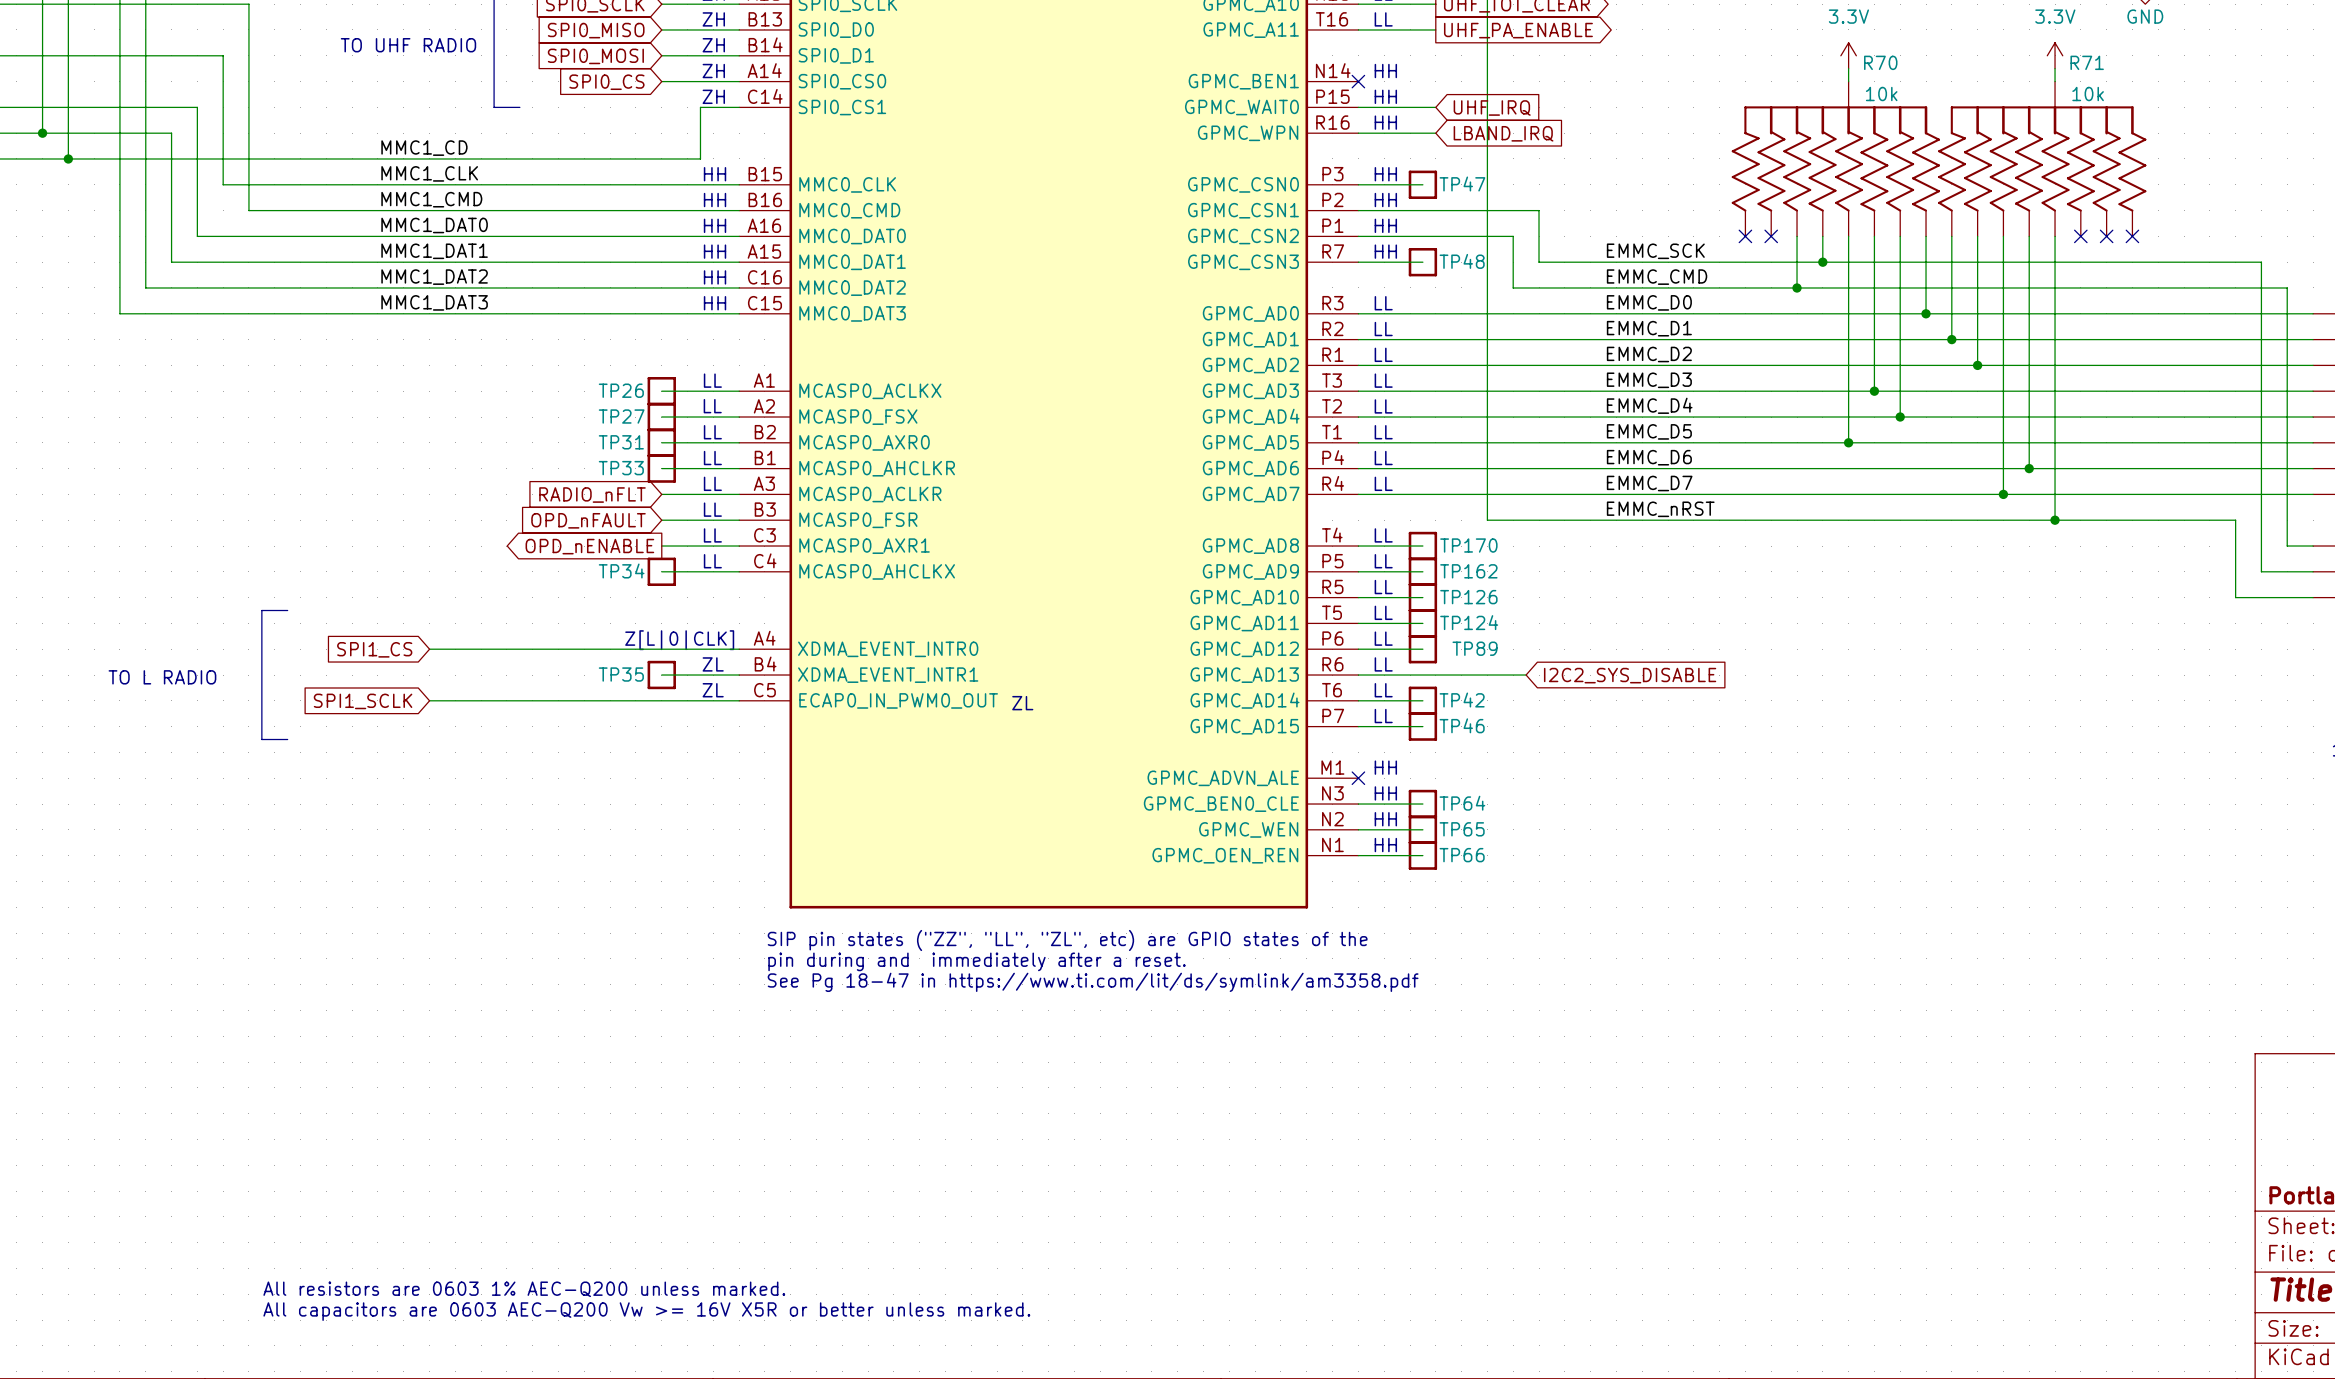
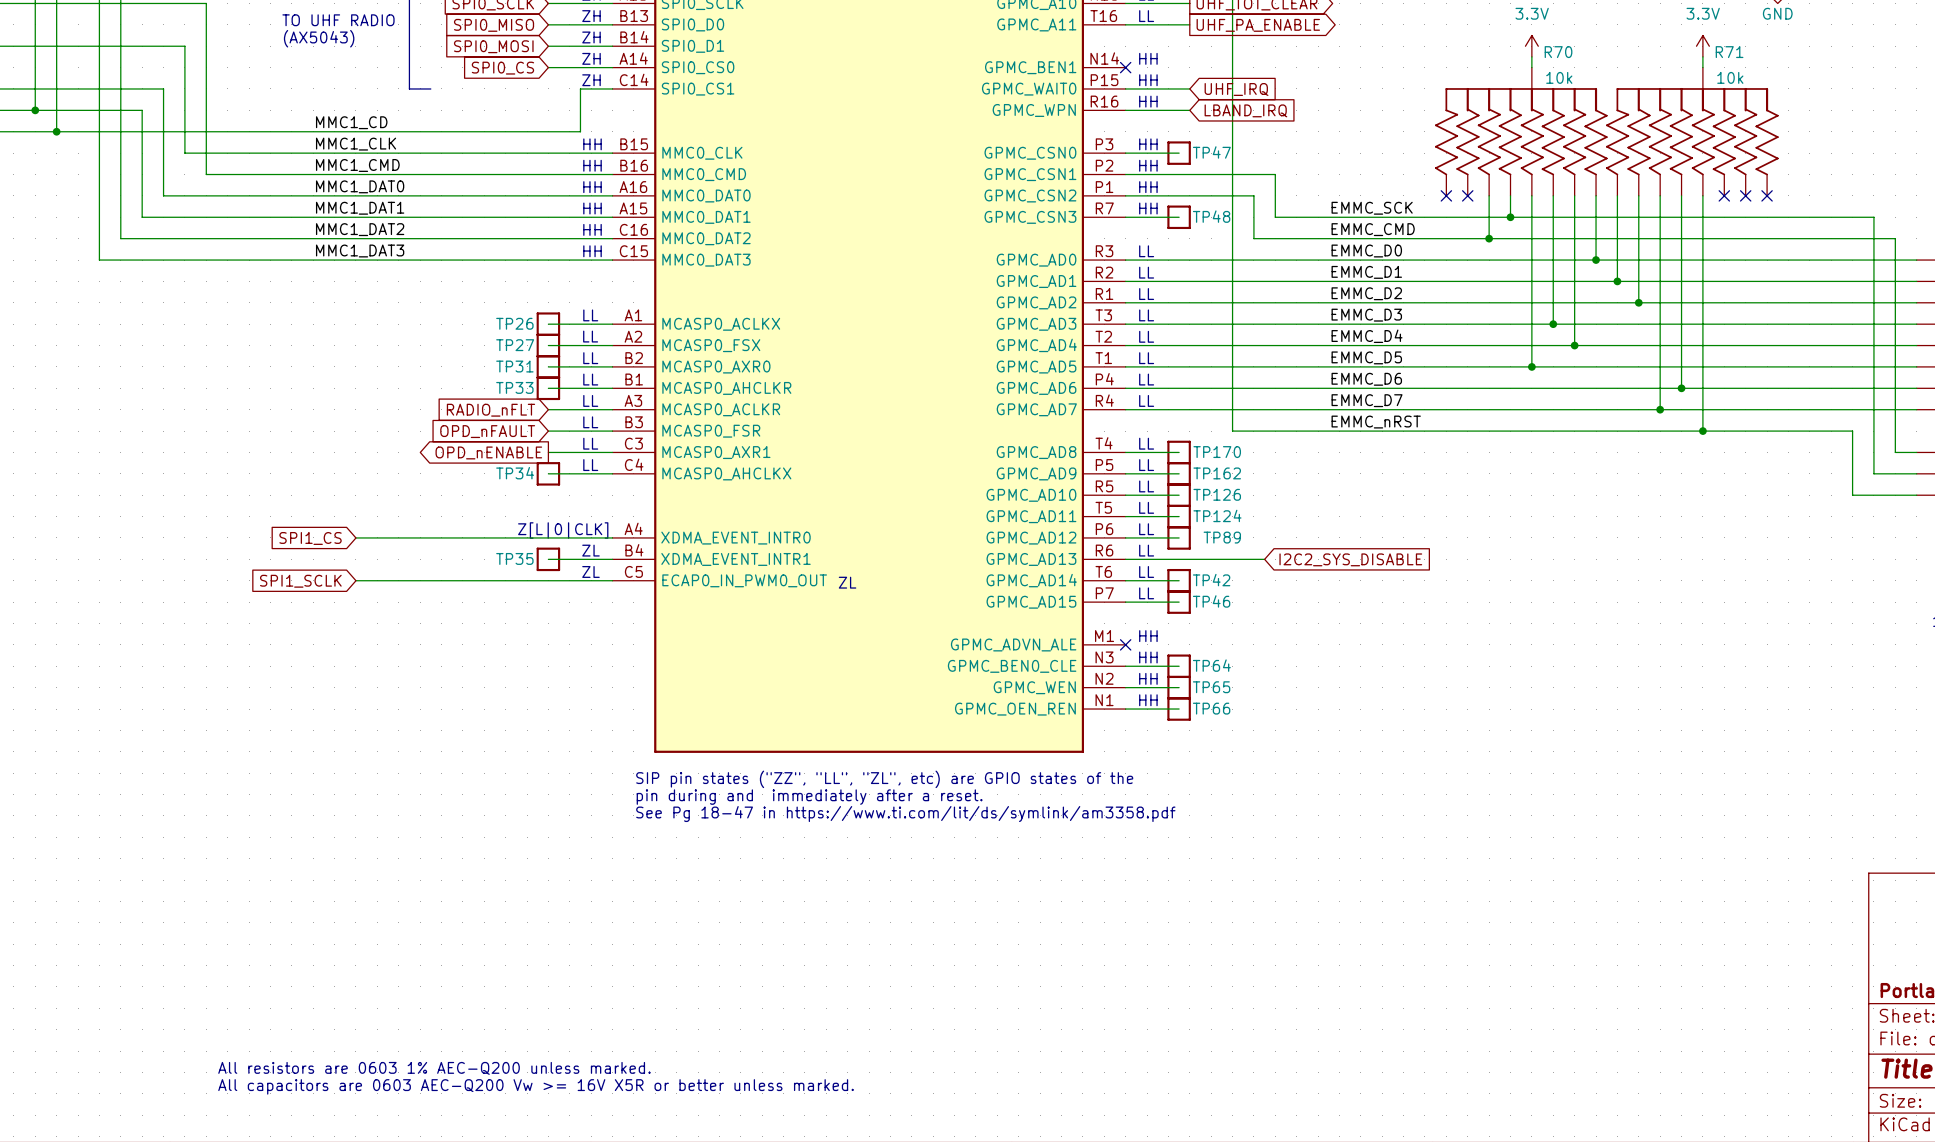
text: none -> TO UHF RADIO (338, 20)
text: TO UHF RADIO (408, 45) -> (AX5043) (319, 38)
line: (287, 610) (261, 610) (261, 739) (287, 739) -> none
text: TO L RADIO (162, 677) -> none

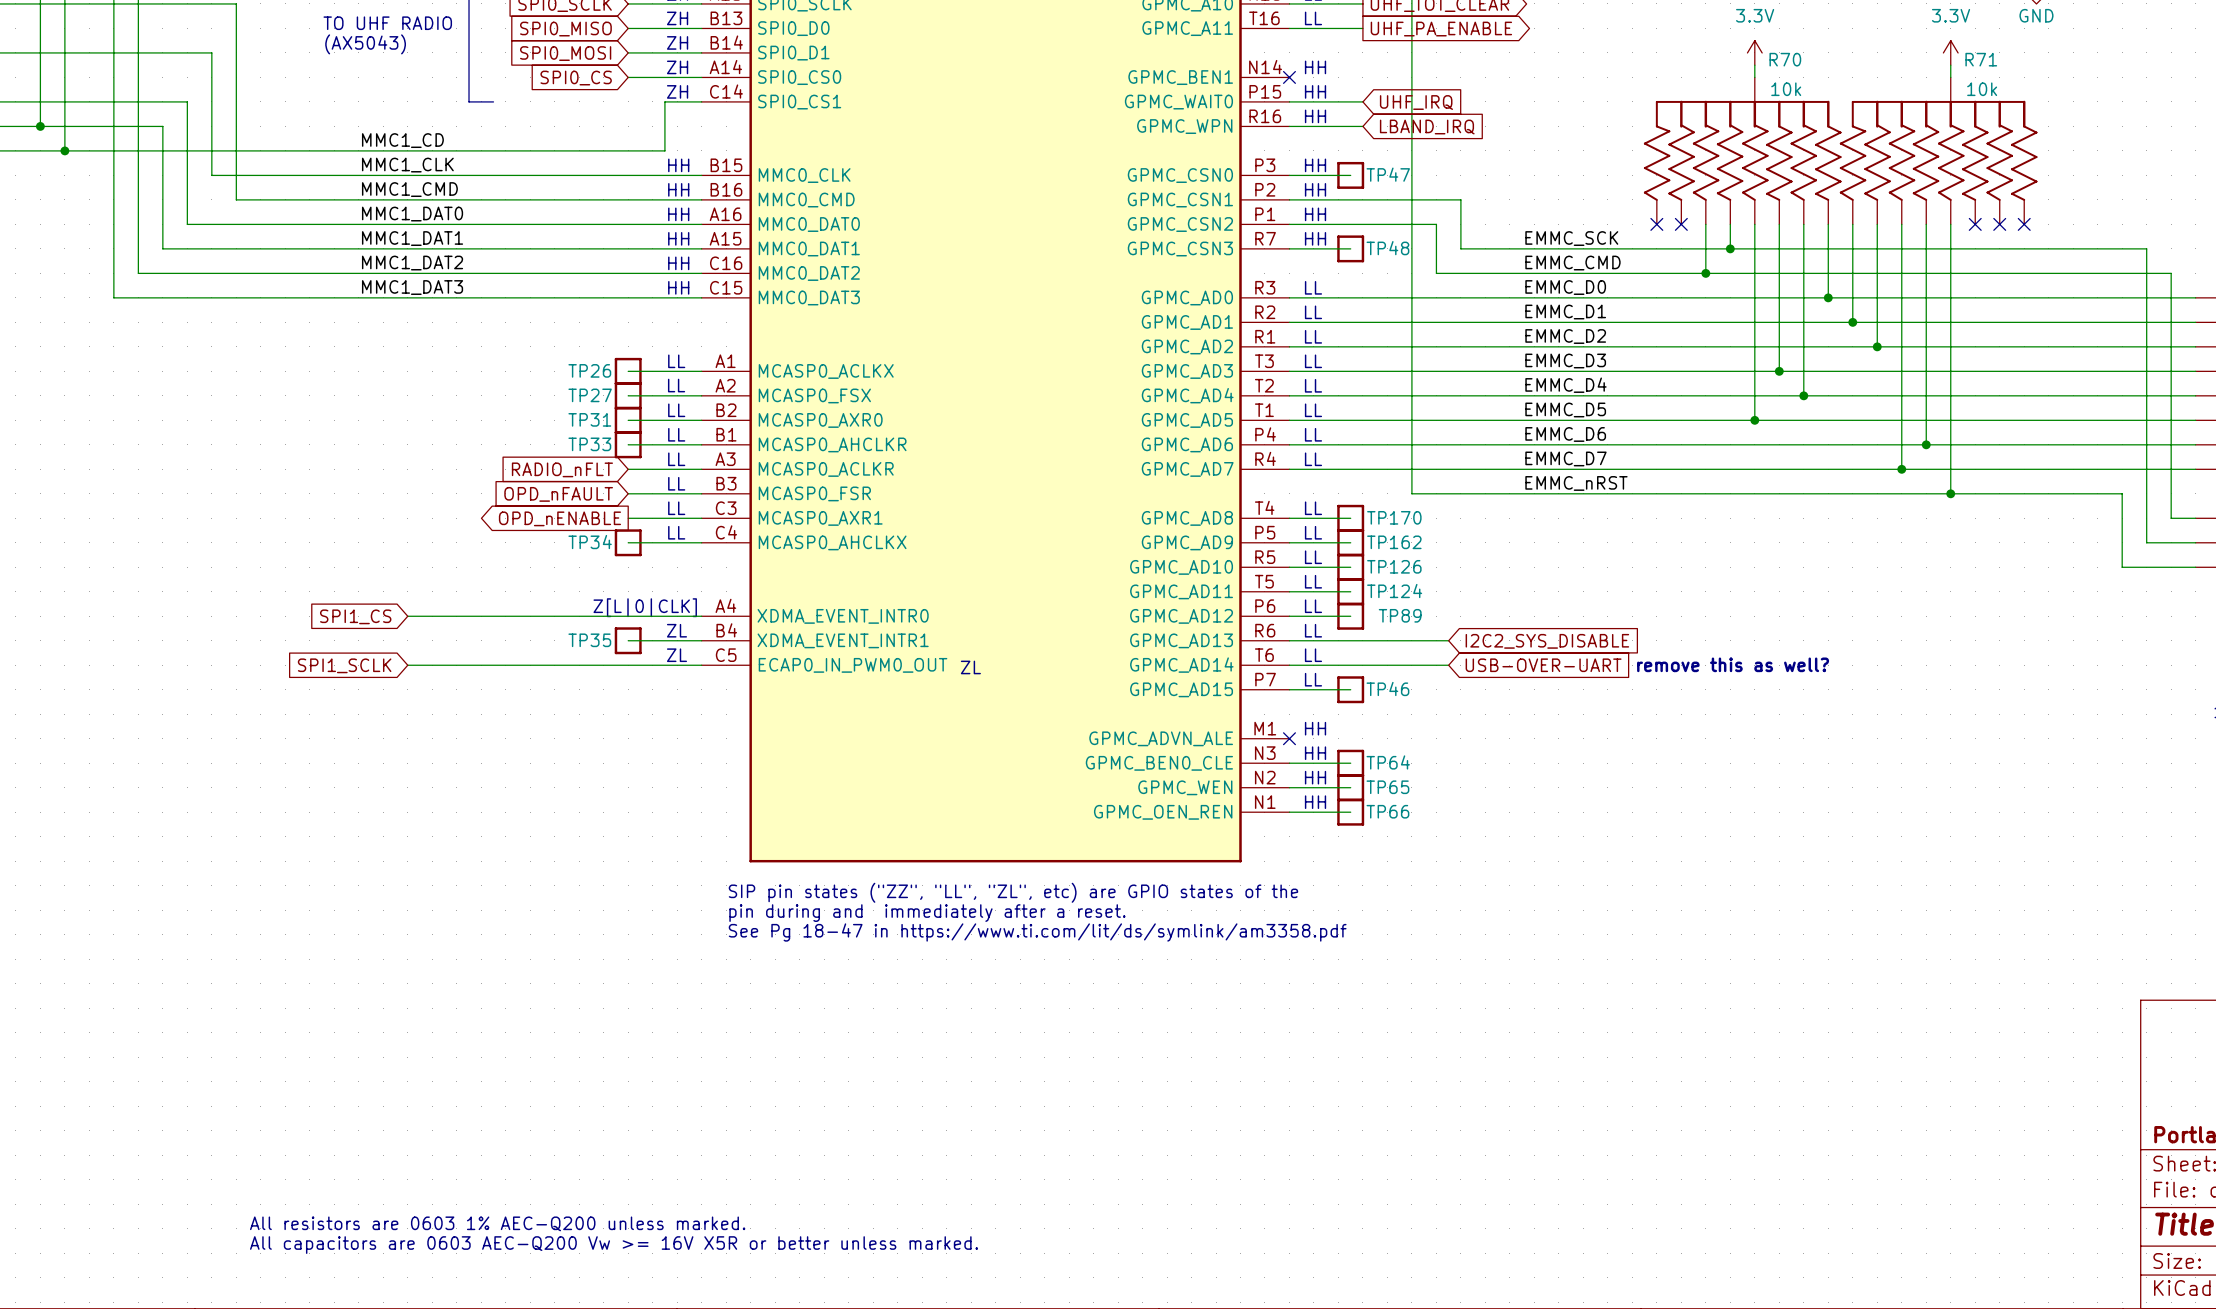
wire: none -> (1350, 665) (1448, 665)
TP42: (1179, 580) -> none
global label: none -> USB-OVER-UART (1543, 665)
text: none -> remove this as well? (1733, 664)

